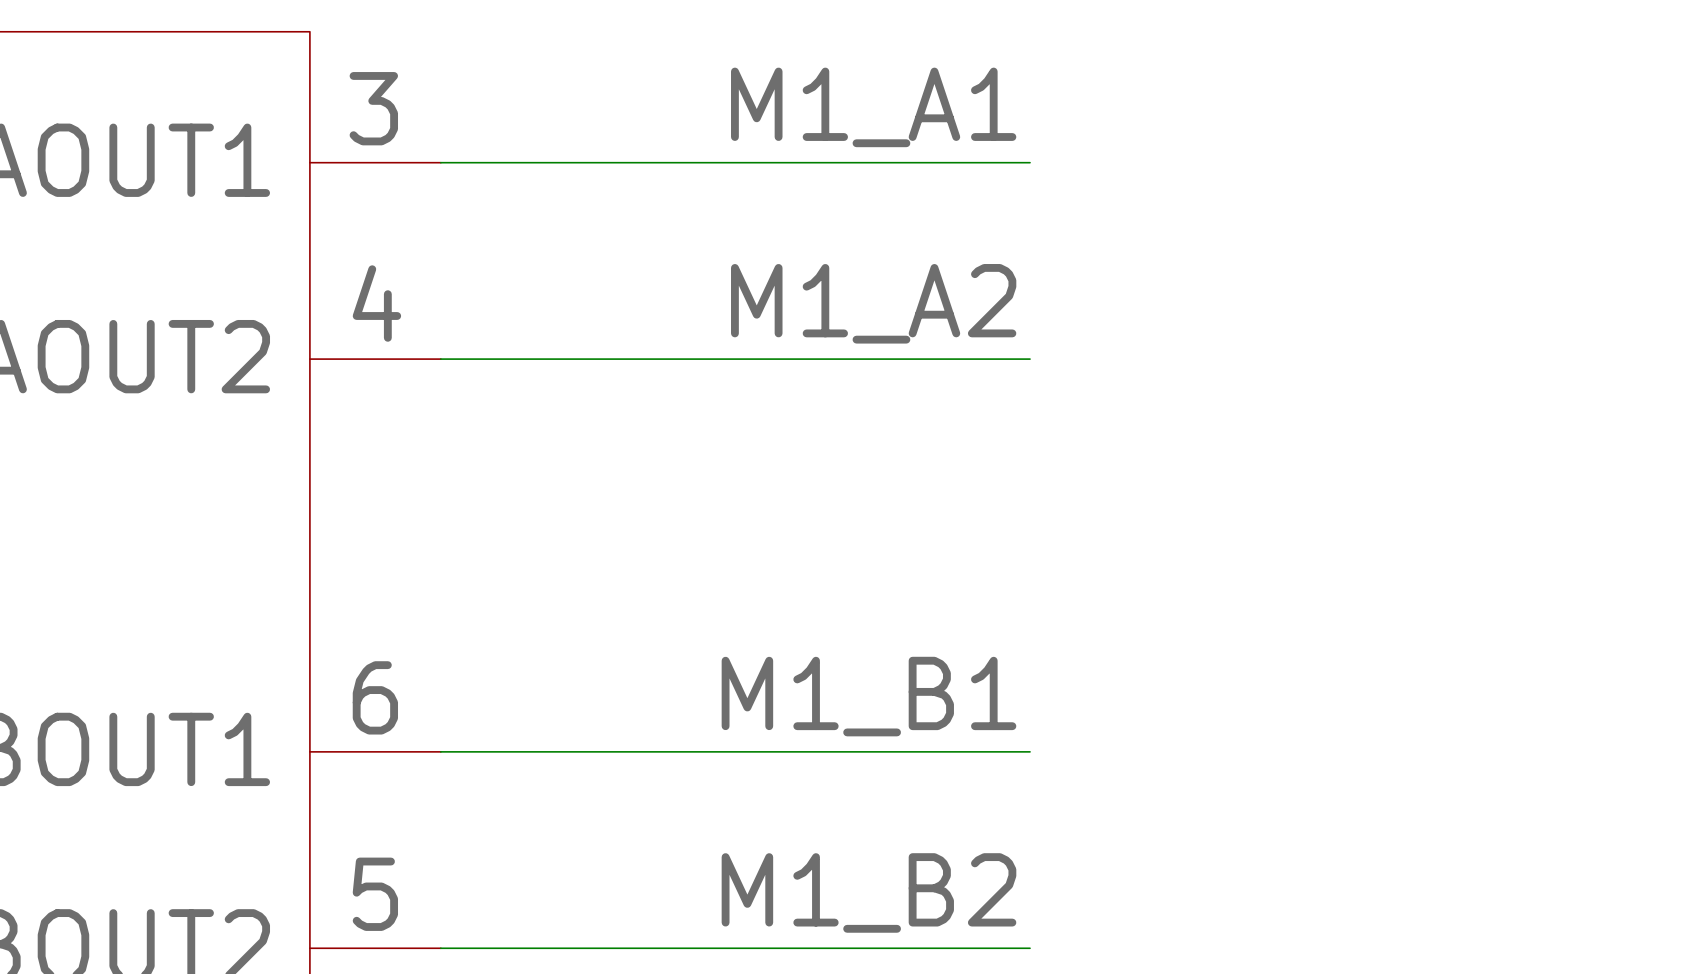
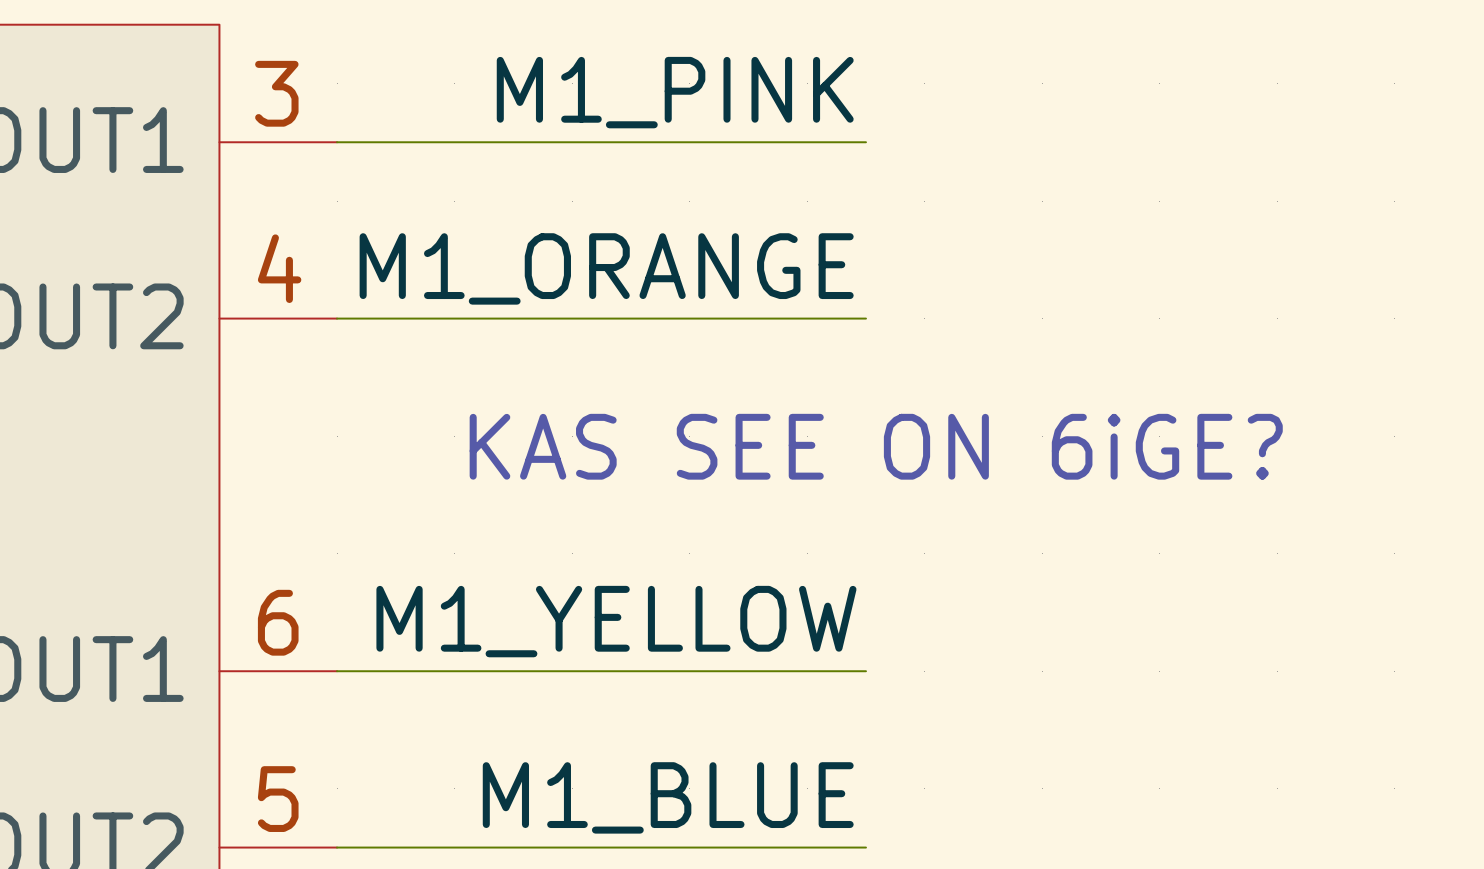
label: M1_A1 (873, 107) -> M1_PINK (675, 92)
label: M1_A2 (873, 303) -> M1_ORANGE (606, 268)
text: none -> KAS SEE ON 6iGE? (876, 446)
label: M1_B1 (868, 696) -> M1_YELLOW (616, 621)
label: M1_B2 (868, 892) -> M1_BLUE (668, 797)

